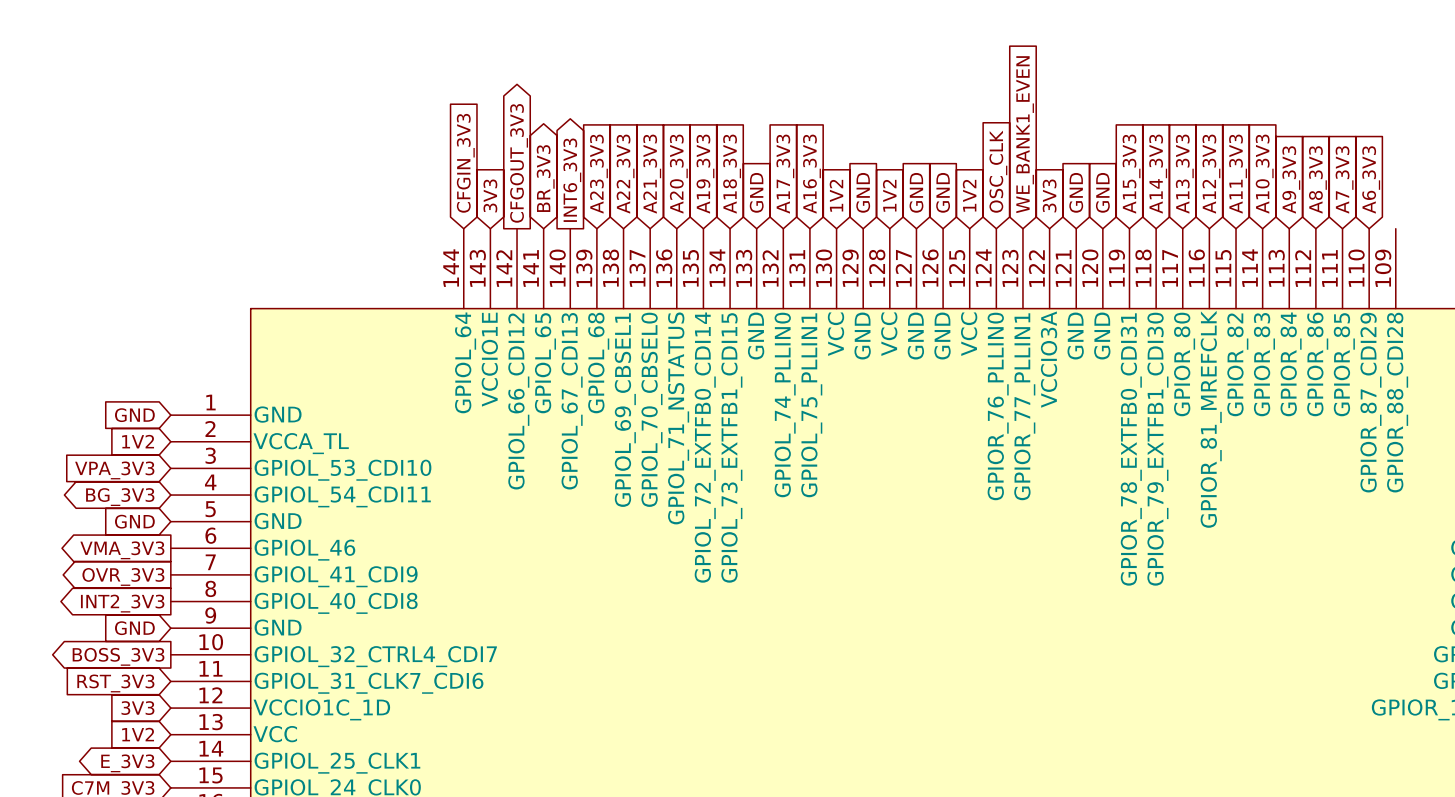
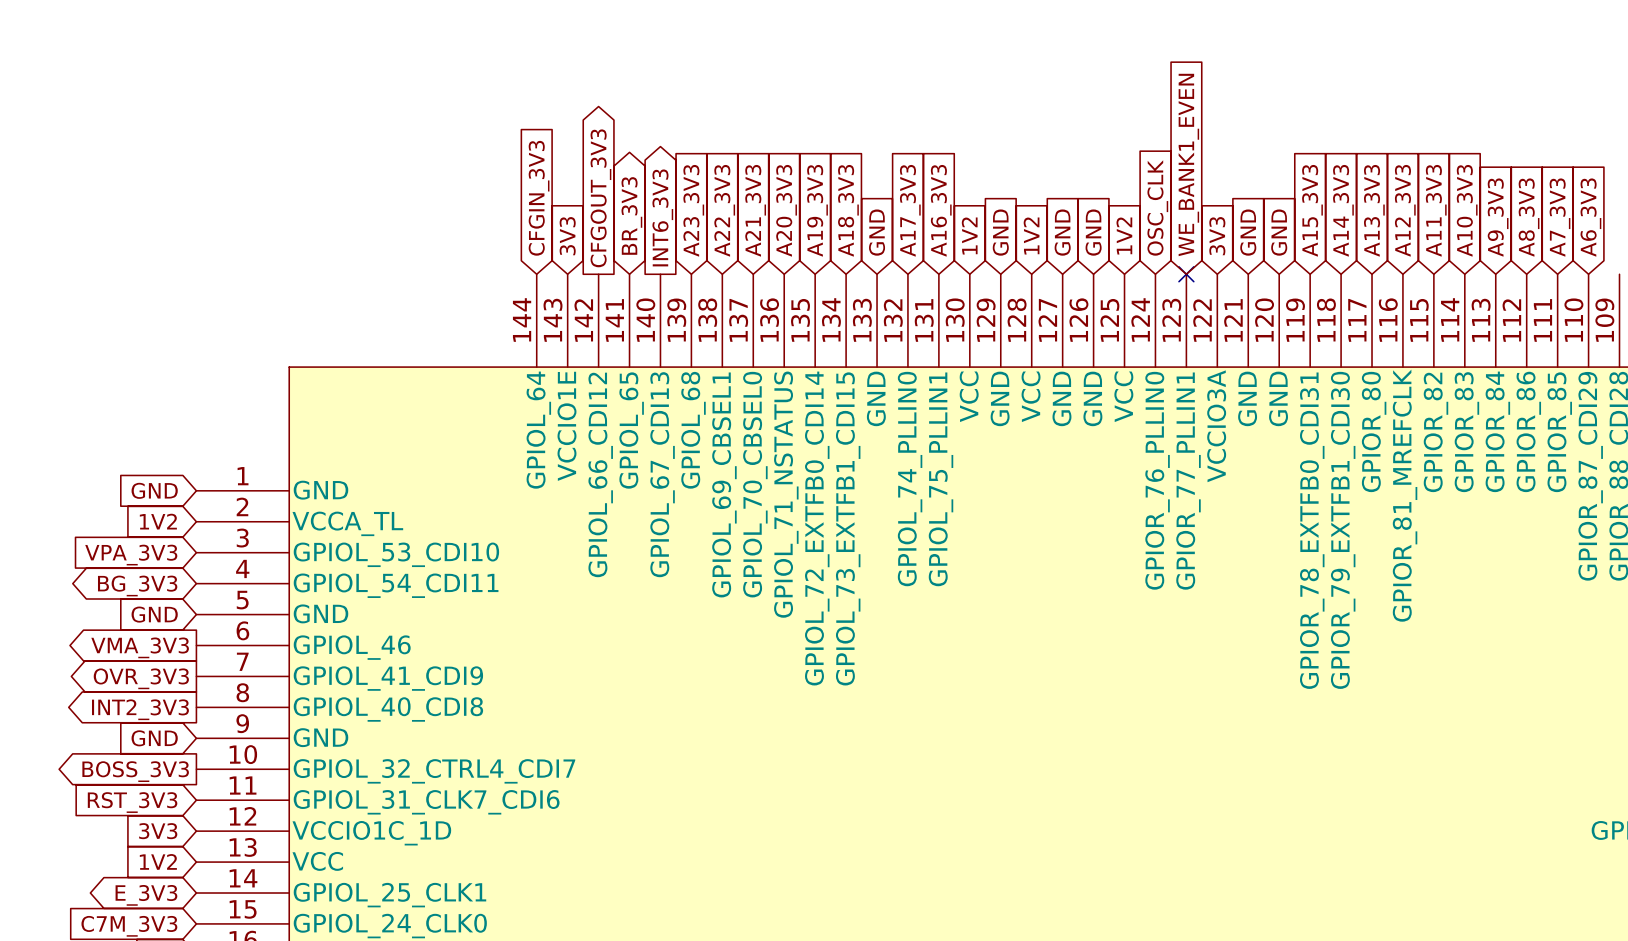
no-connect mark: none -> (1186, 274)

